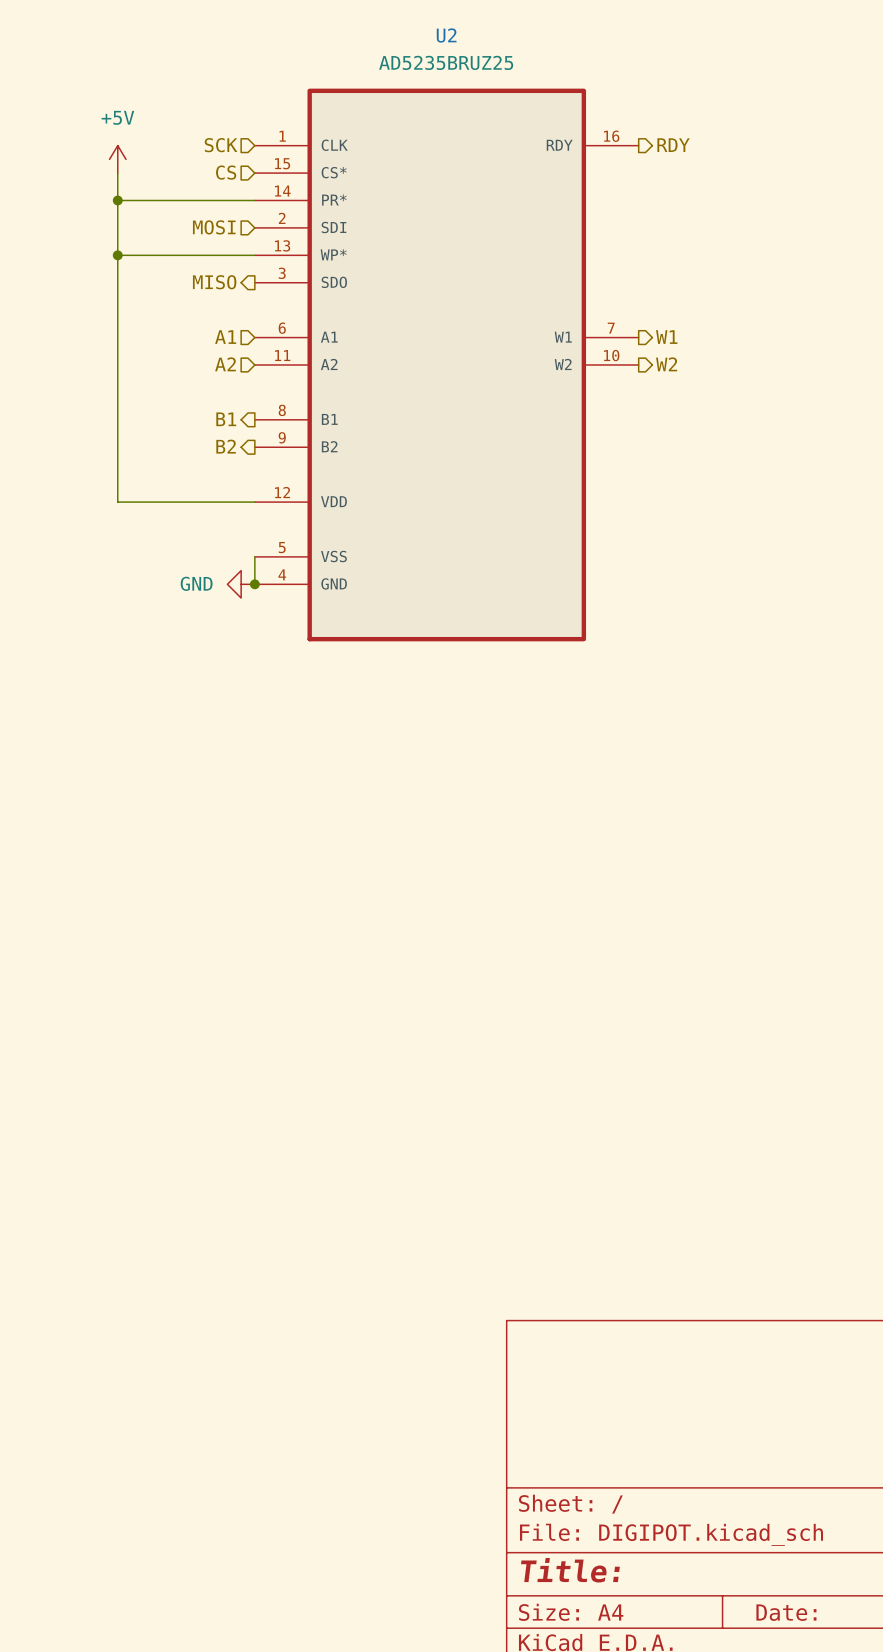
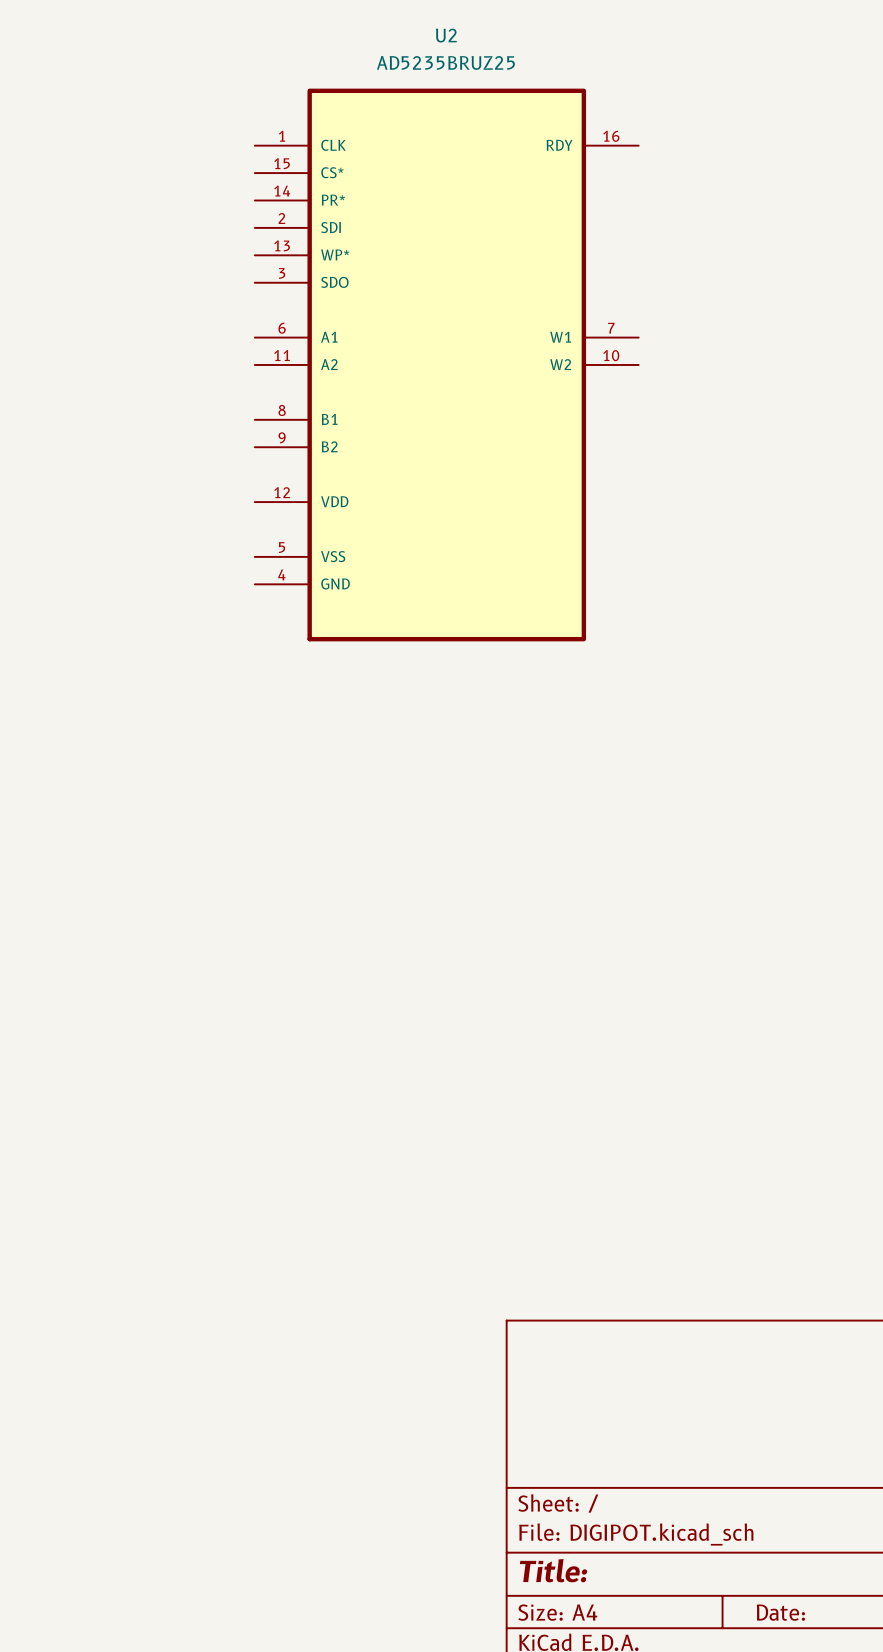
hierarchical label: SCK (221, 145) -> none
hierarchical label: RDY (673, 145) -> none
power symbol: +5V (117, 159) -> none
hierarchical label: CS (226, 172) -> none
wire: (117, 173) (117, 502) (254, 502) -> none
wire: (117, 200) (254, 200) -> none
junction: (117, 200) -> none
hierarchical label: MOSI (214, 227) -> none
wire: (117, 255) (254, 255) -> none
junction: (117, 255) -> none
hierarchical label: MISO (214, 282) -> none
hierarchical label: A1 (225, 337) -> none
hierarchical label: W1 (666, 337) -> none
hierarchical label: A2 (225, 364) -> none
hierarchical label: W2 (666, 364) -> none
hierarchical label: B1 (226, 419) -> none
hierarchical label: B2 (226, 446) -> none
wire: (254, 556) (254, 584) -> none
power symbol: GND (241, 584) -> none
junction: (254, 584) -> none

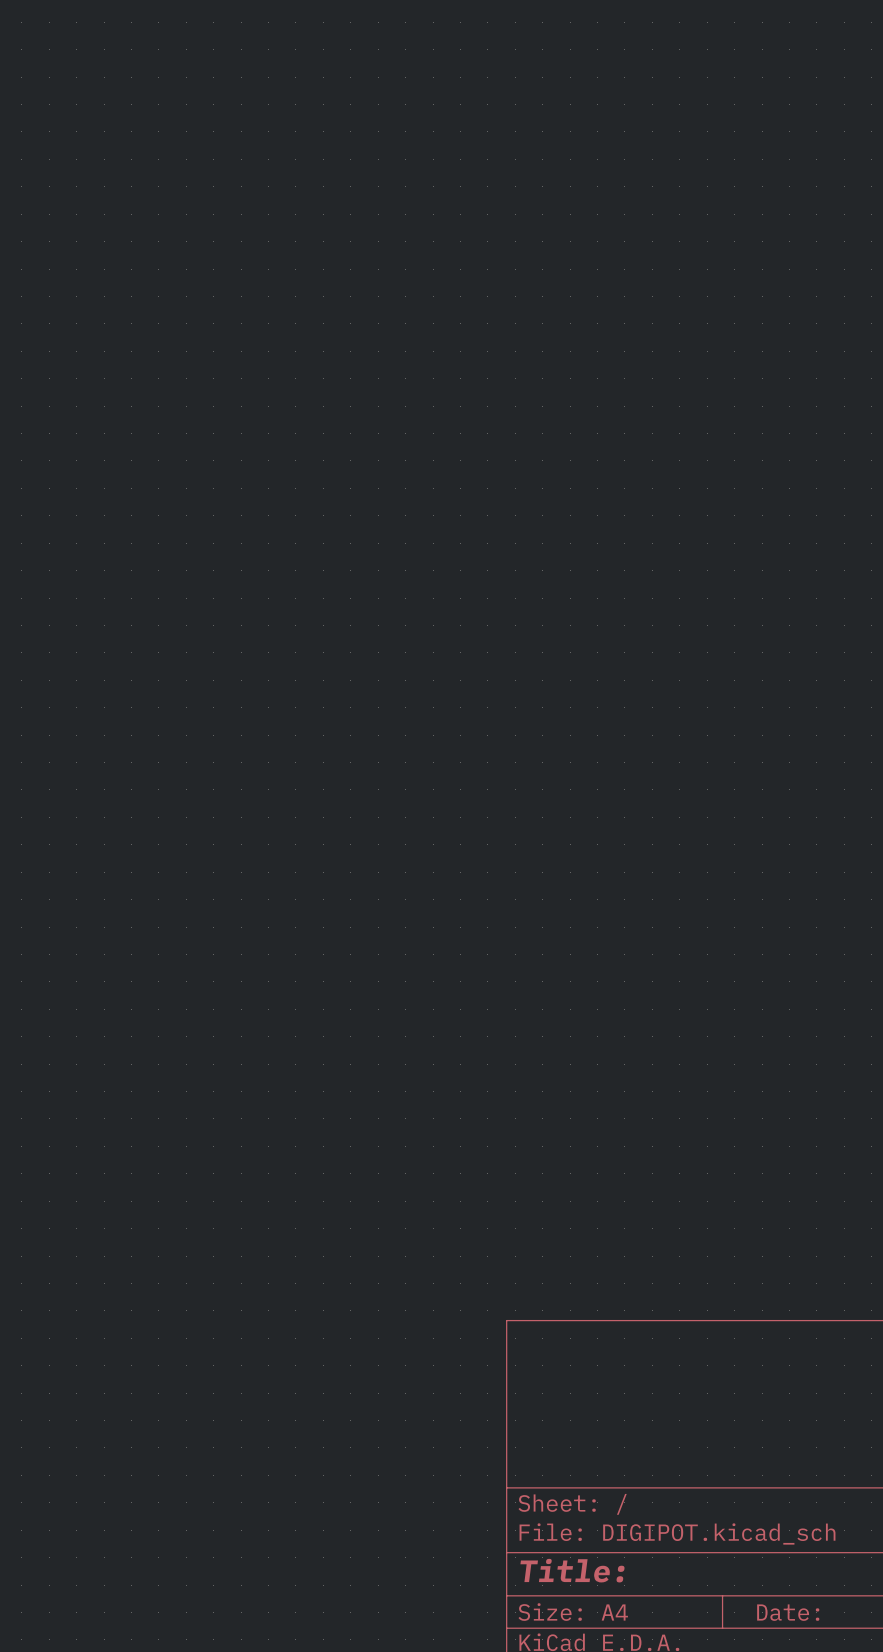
U2: AD5235BRUZ25 (446, 364) -> none

